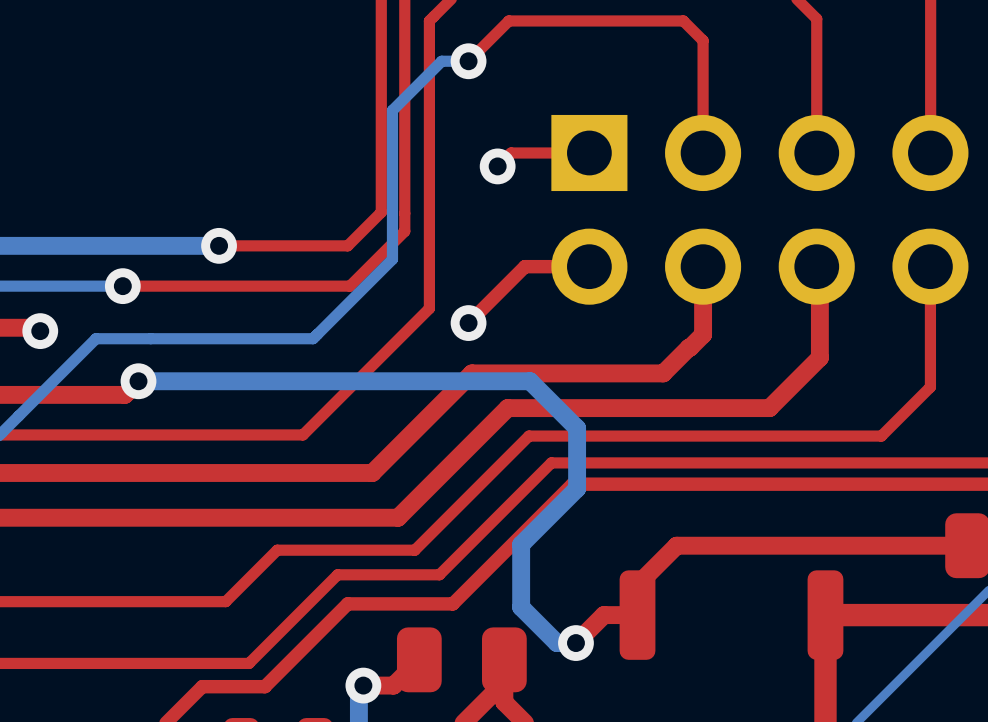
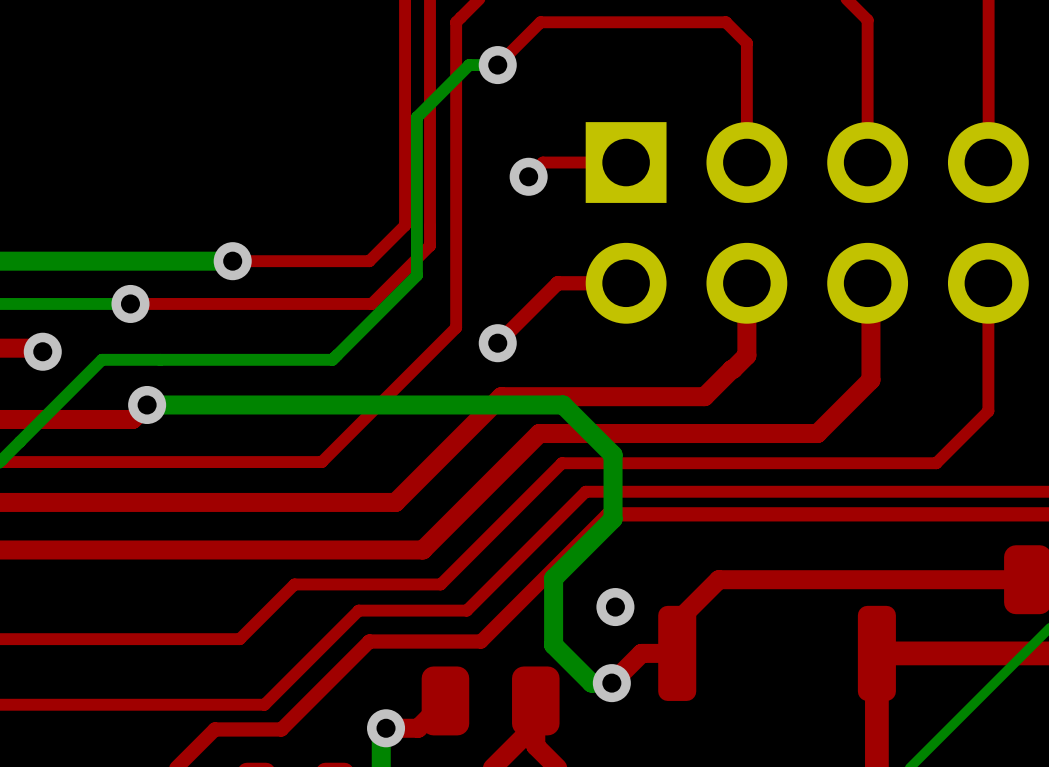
via: none -> (615, 607)

